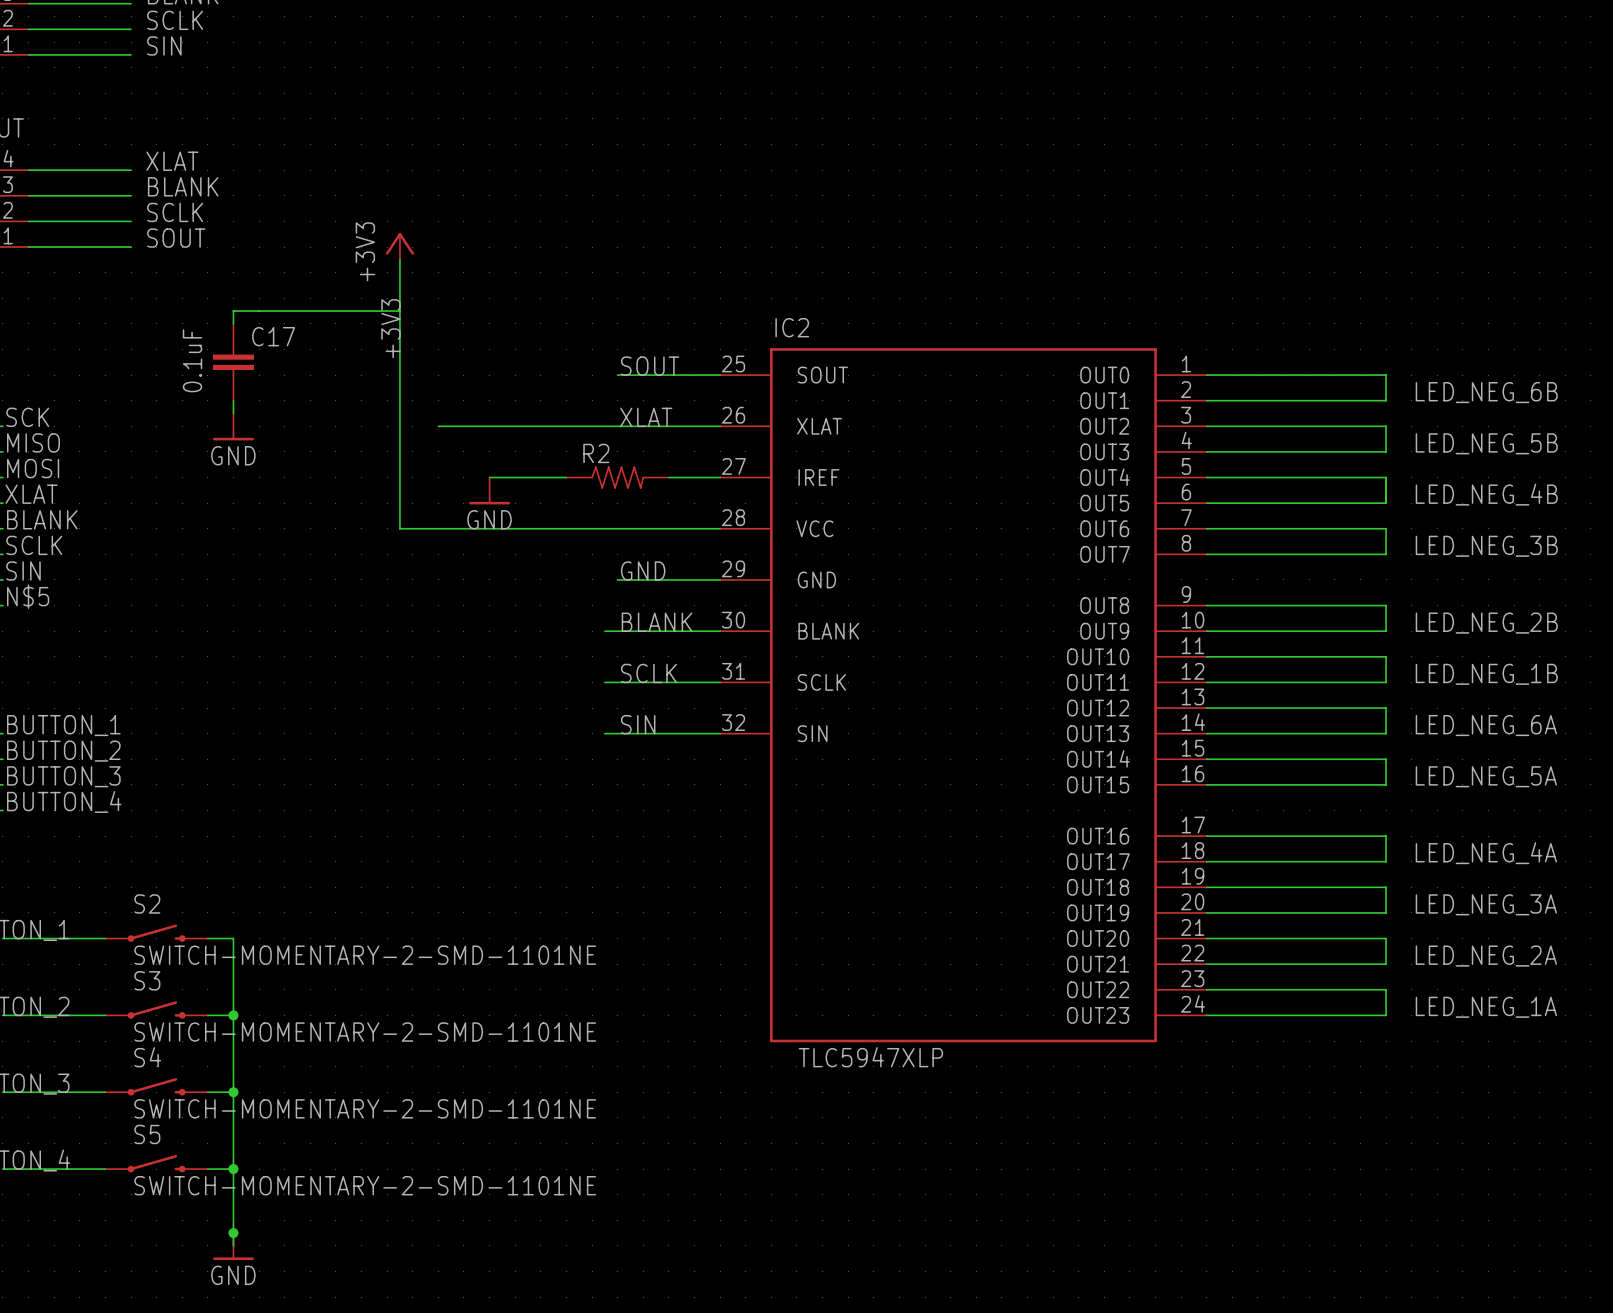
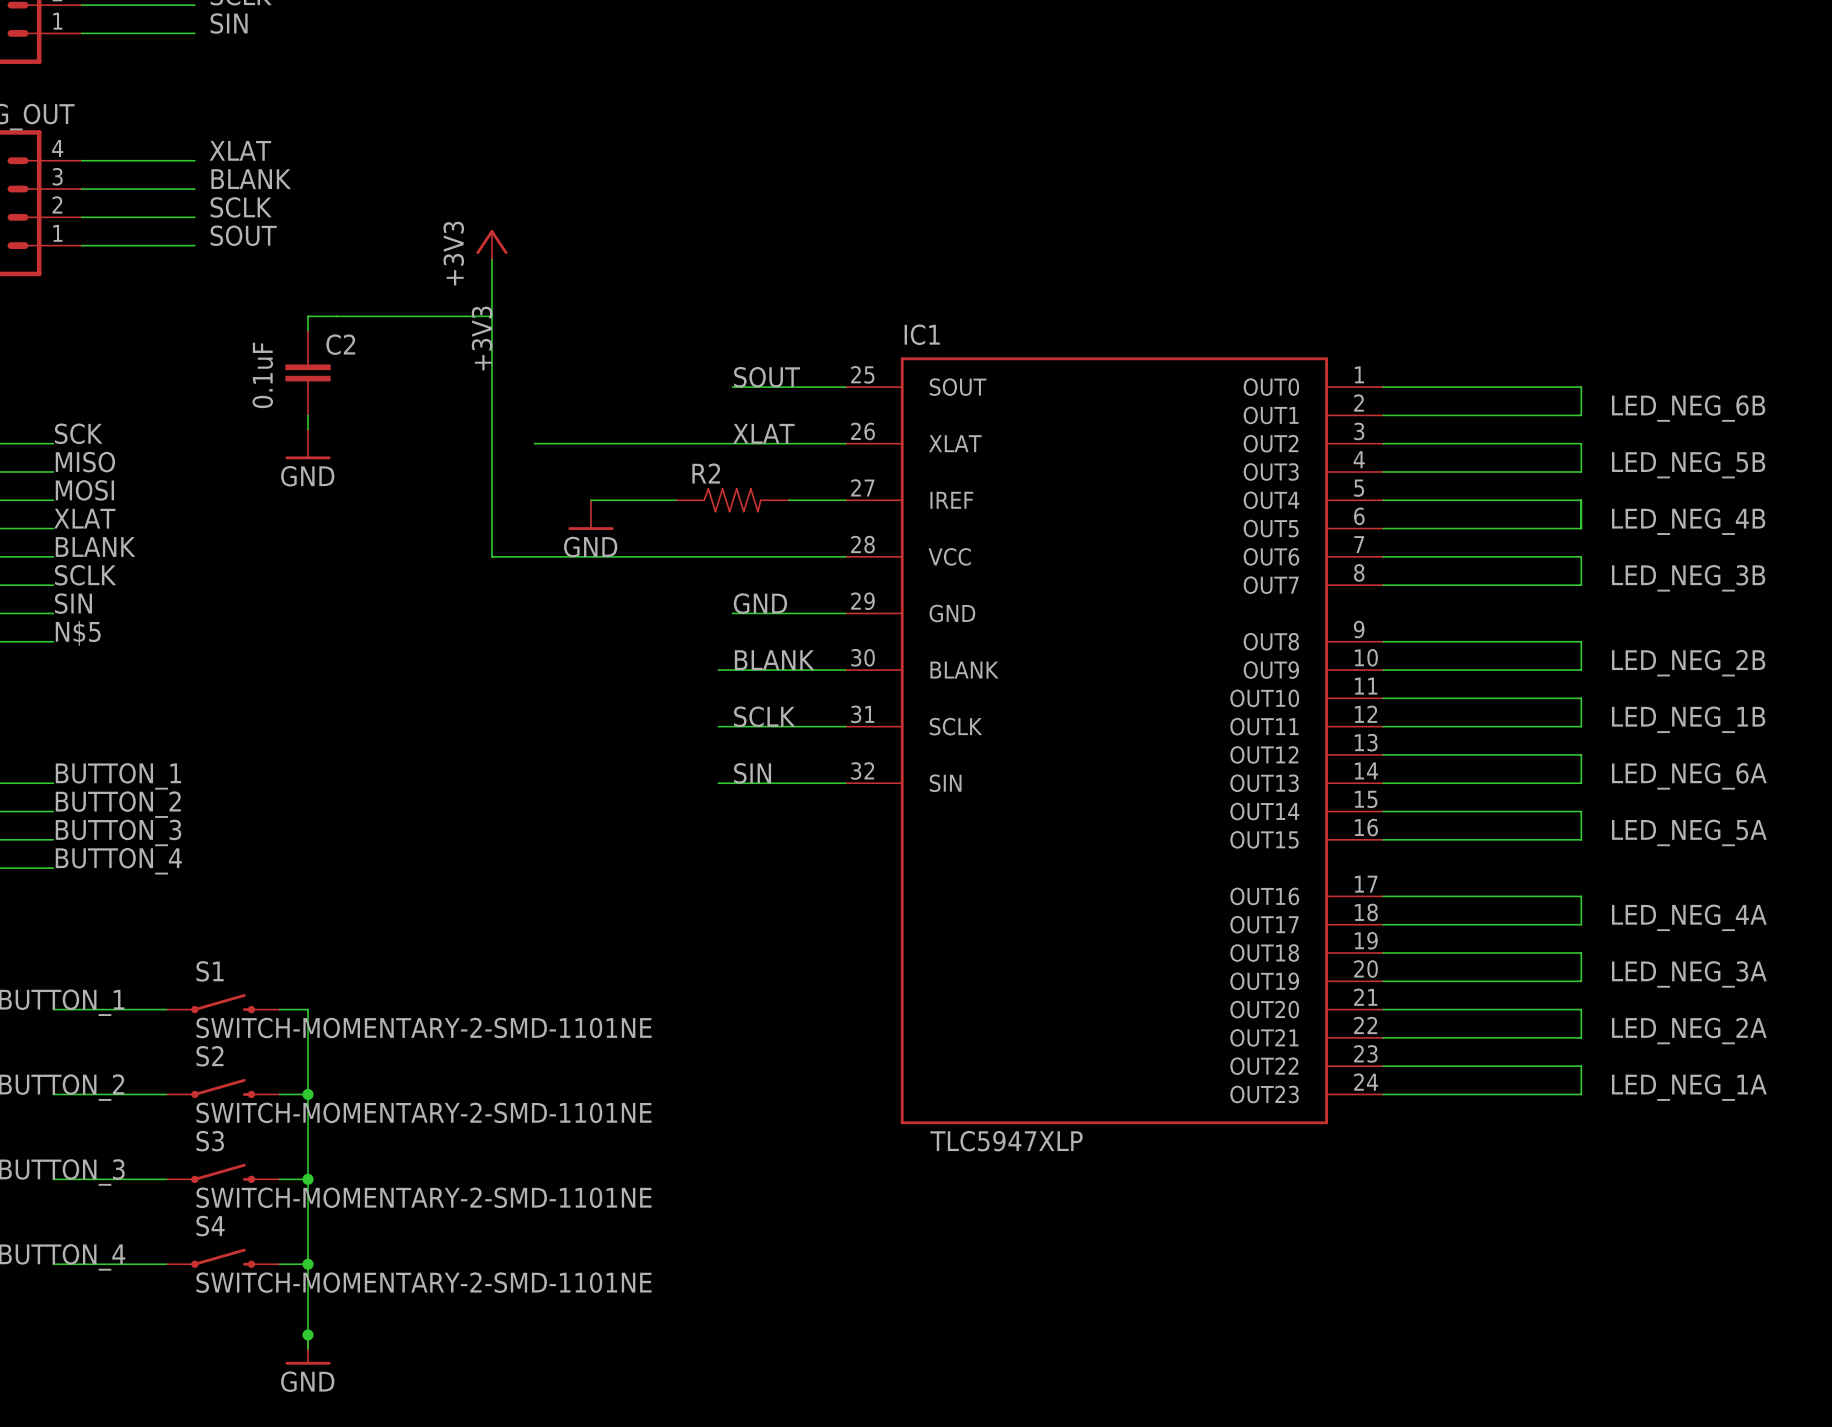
IC2 name: IC2 (792, 327) -> IC1 (922, 334)
C17 name: C17 (273, 336) -> C2 (340, 344)
S2 name: S2 (147, 903) -> S1 (210, 971)
S3 name: S3 (147, 980) -> S2 (209, 1056)
S4 name: S4 (147, 1057) -> S3 (210, 1141)
S5 name: S5 (147, 1134) -> S4 (210, 1226)

